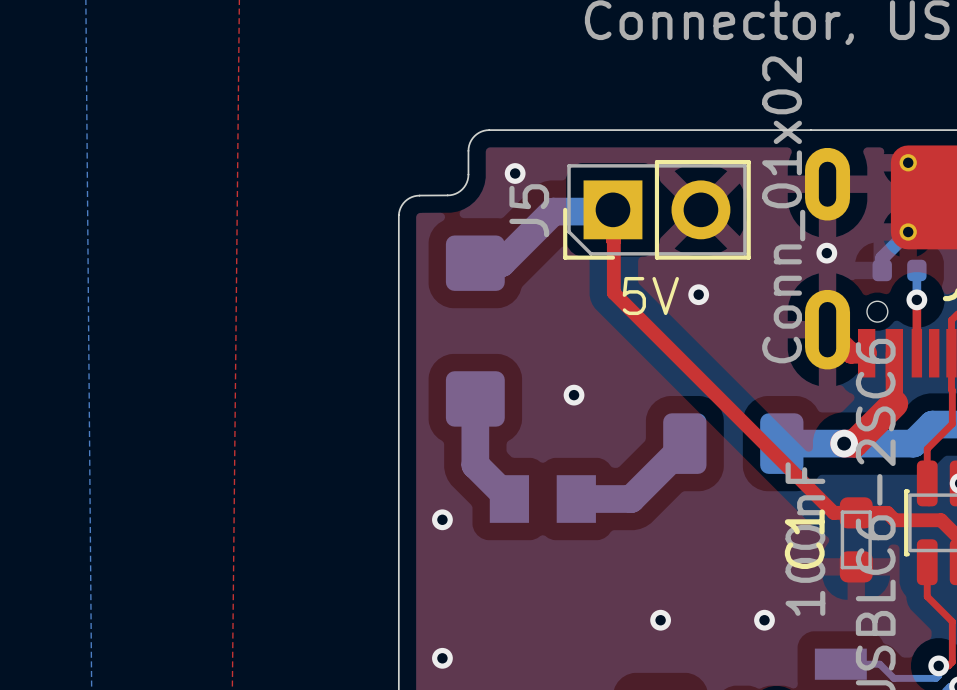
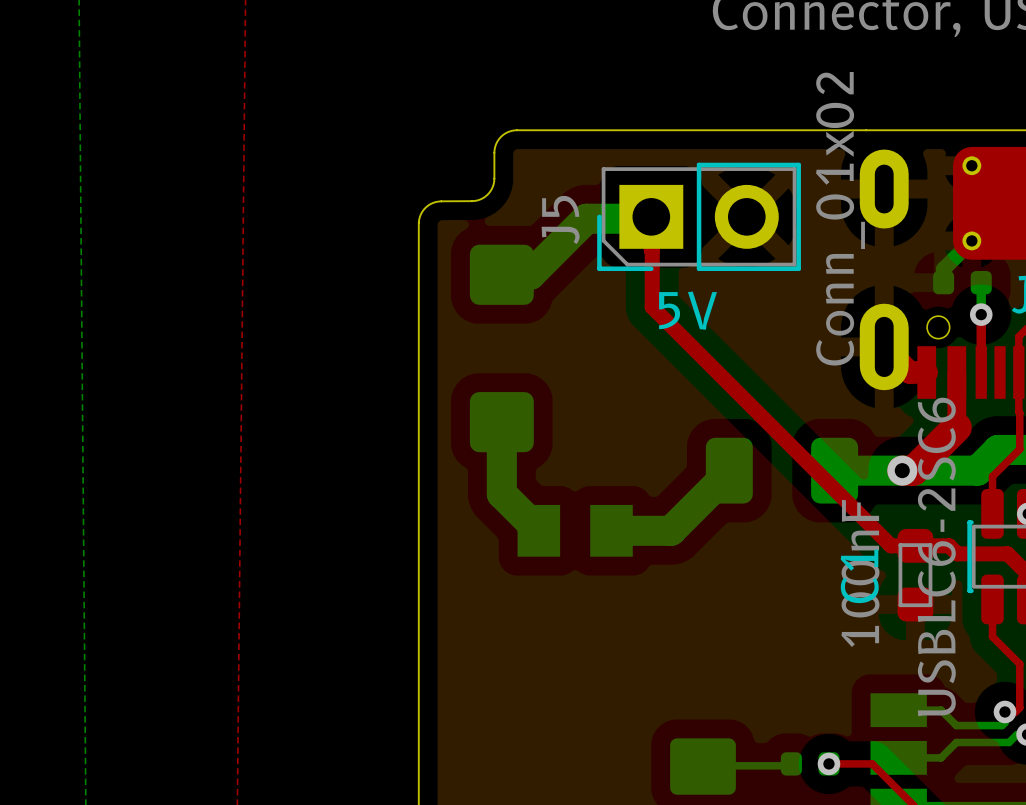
via: (515, 173) -> none
via: (826, 253) -> none
via: (698, 294) -> none
via: (574, 395) -> none
via: (442, 519) -> none
via: (660, 620) -> none
via: (764, 620) -> none
via: (442, 658) -> none

